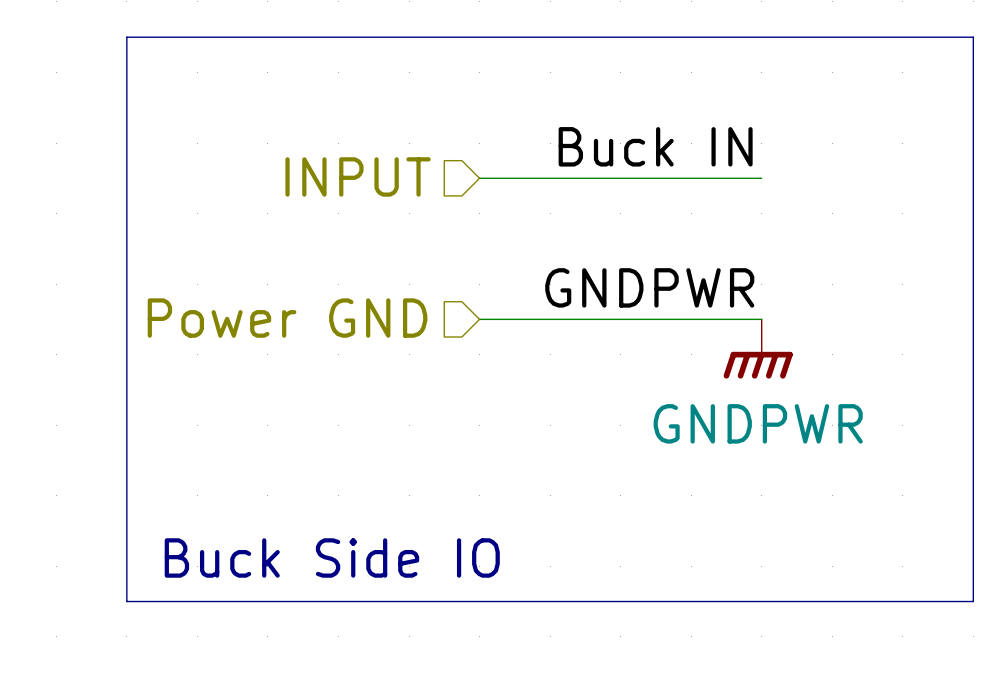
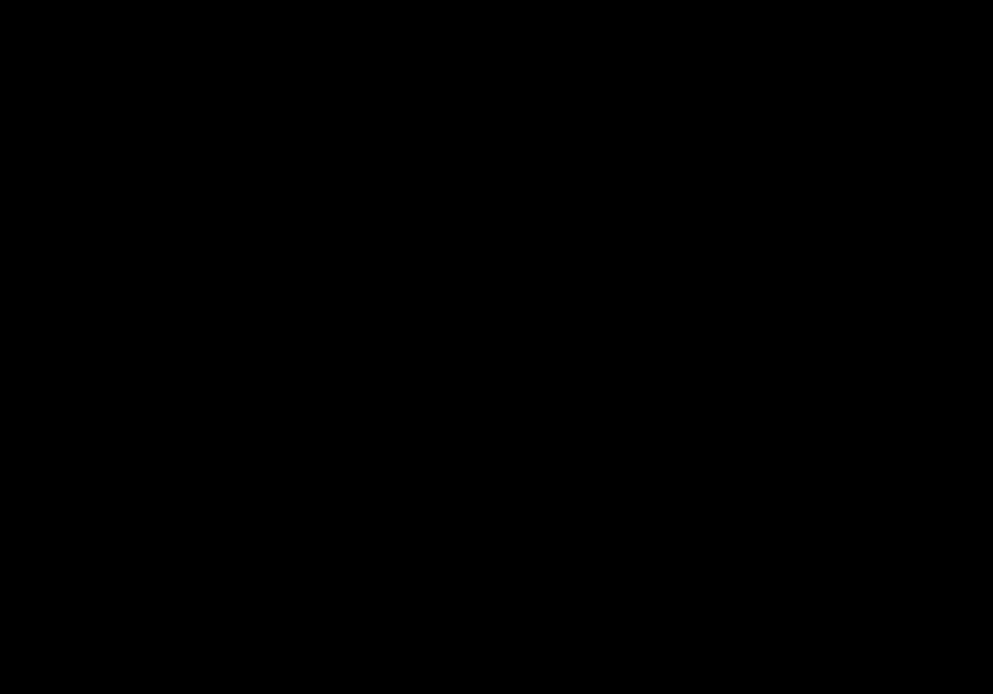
line: (126, 37) (973, 37) (973, 601) (126, 601) (126, 37) -> none
label: Buck IN (655, 146) -> none
hierarchical label: INPUT (358, 176) -> none
wire: (479, 178) (761, 178) -> none
label: GNDPWR (649, 287) -> none
hierarchical label: Power GND (287, 318) -> none
wire: (479, 319) (761, 319) -> none
power symbol: GNDPWR (758, 348) -> none
text: Buck Side IO (332, 557) -> none

